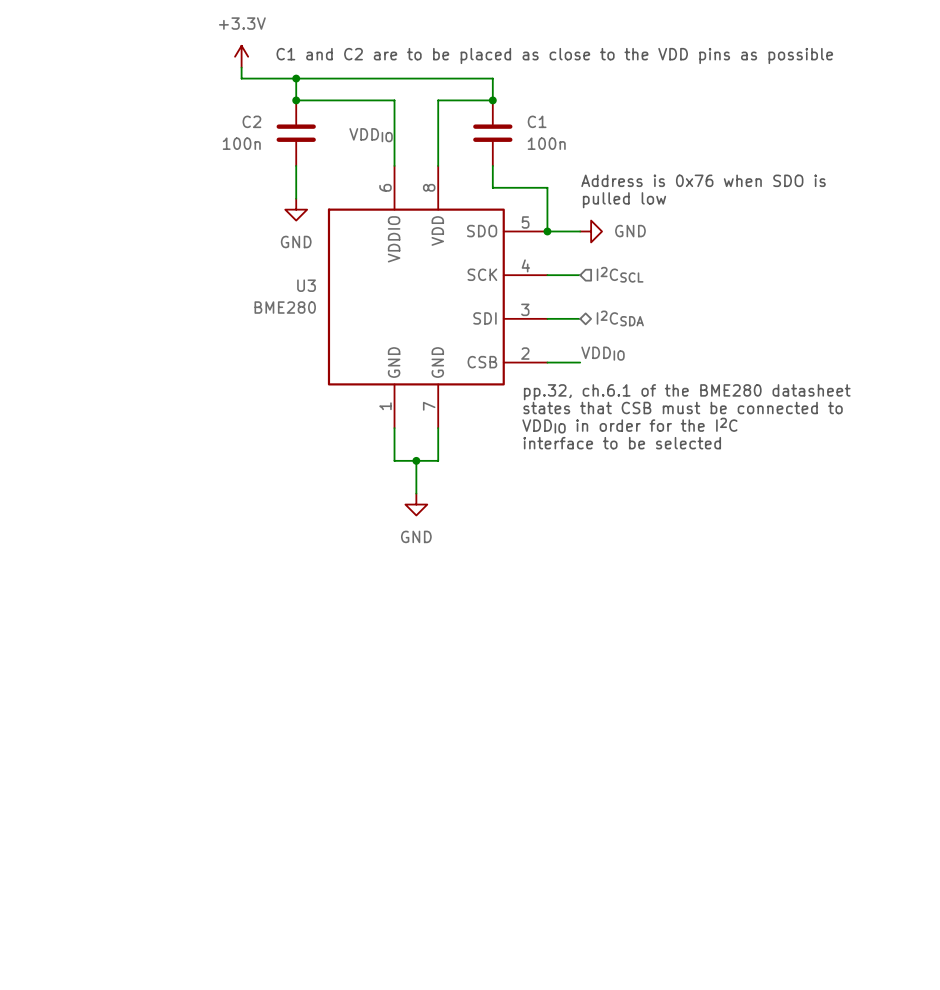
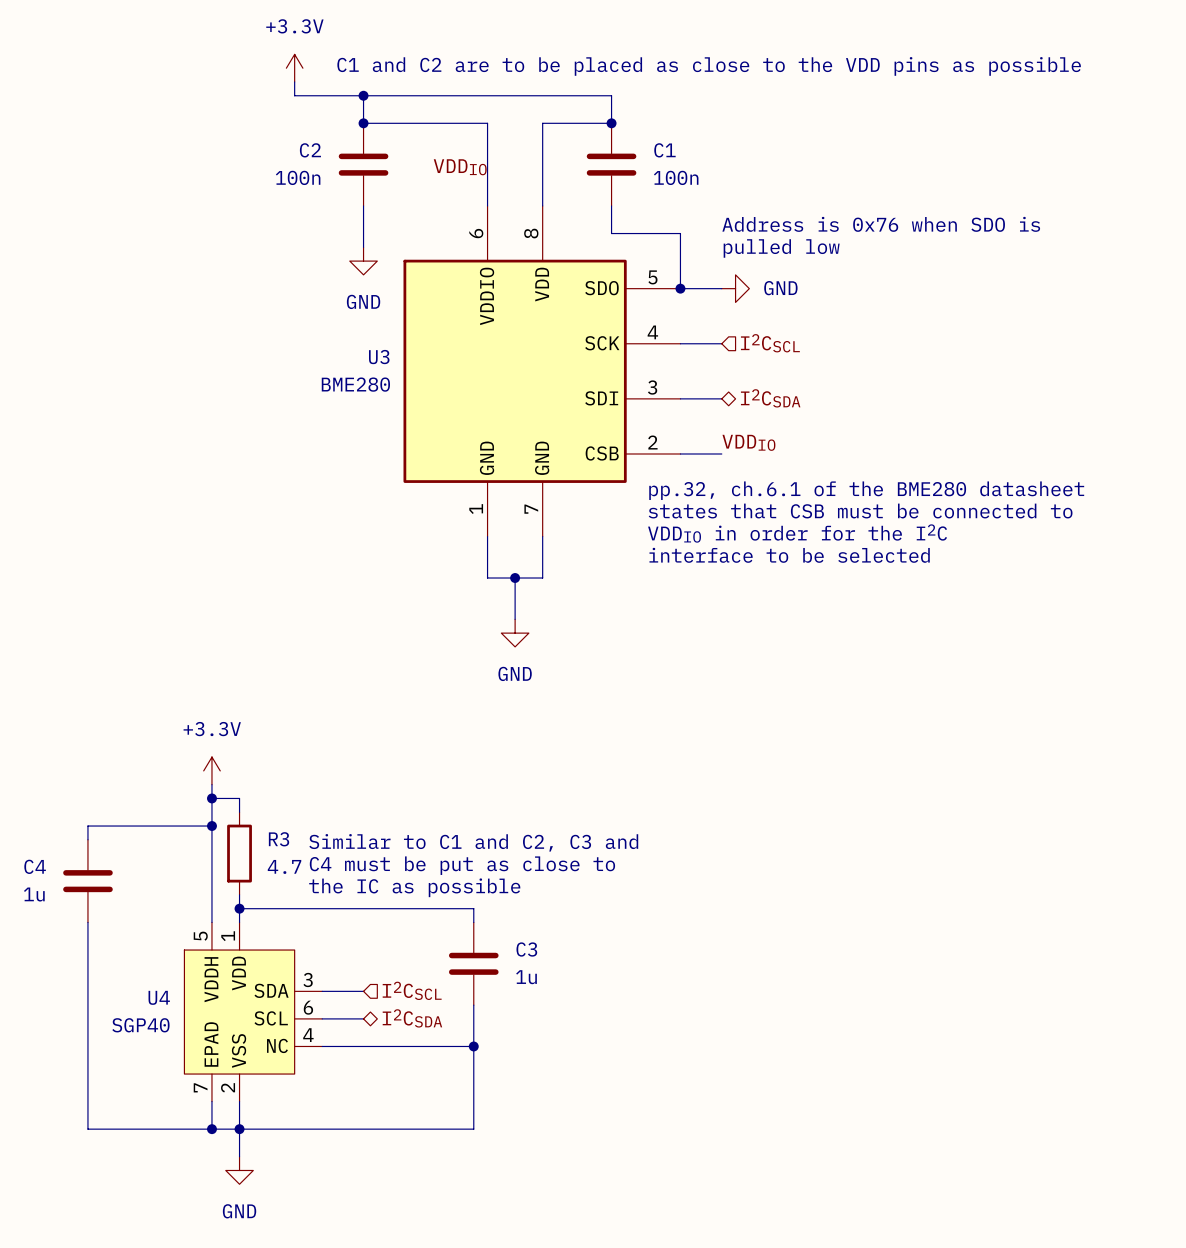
power symbol: none -> +3.3V (211, 770)
wire: none -> (211, 784) (211, 922)
wire: none -> (211, 798) (239, 798) (239, 812)
junction: none -> (211, 798)
wire: none -> (211, 826) (87, 826) (87, 839)
junction: none -> (211, 826)
text: none -> Similar to C1 and C2, C3 and (473, 842)
R3: none -> 4.7 (239, 853)
text: none -> C4 must be put as close to (462, 865)
C4: none -> 1u (87, 881)
text: none -> the IC as possible (414, 887)
wire: none -> (239, 894) (239, 922)
wire: none -> (239, 908) (473, 908) (473, 922)
junction: none -> (239, 908)
wire: none -> (87, 922) (87, 1129) (473, 1129) (473, 1005)
C3: none -> 1u (473, 963)
wire: none -> (322, 991) (363, 991)
hierarchical label: none -> I2CSCL (412, 990)
U4: none -> SGP40 (253, 1012)
hierarchical label: none -> I2CSDA (412, 1018)
wire: none -> (322, 1018) (363, 1018)
wire: none -> (322, 1046) (473, 1046)
junction: none -> (473, 1046)
wire: none -> (211, 1101) (211, 1129)
wire: none -> (239, 1101) (239, 1156)
junction: none -> (211, 1129)
junction: none -> (239, 1129)
power symbol: none -> GND (239, 1170)

